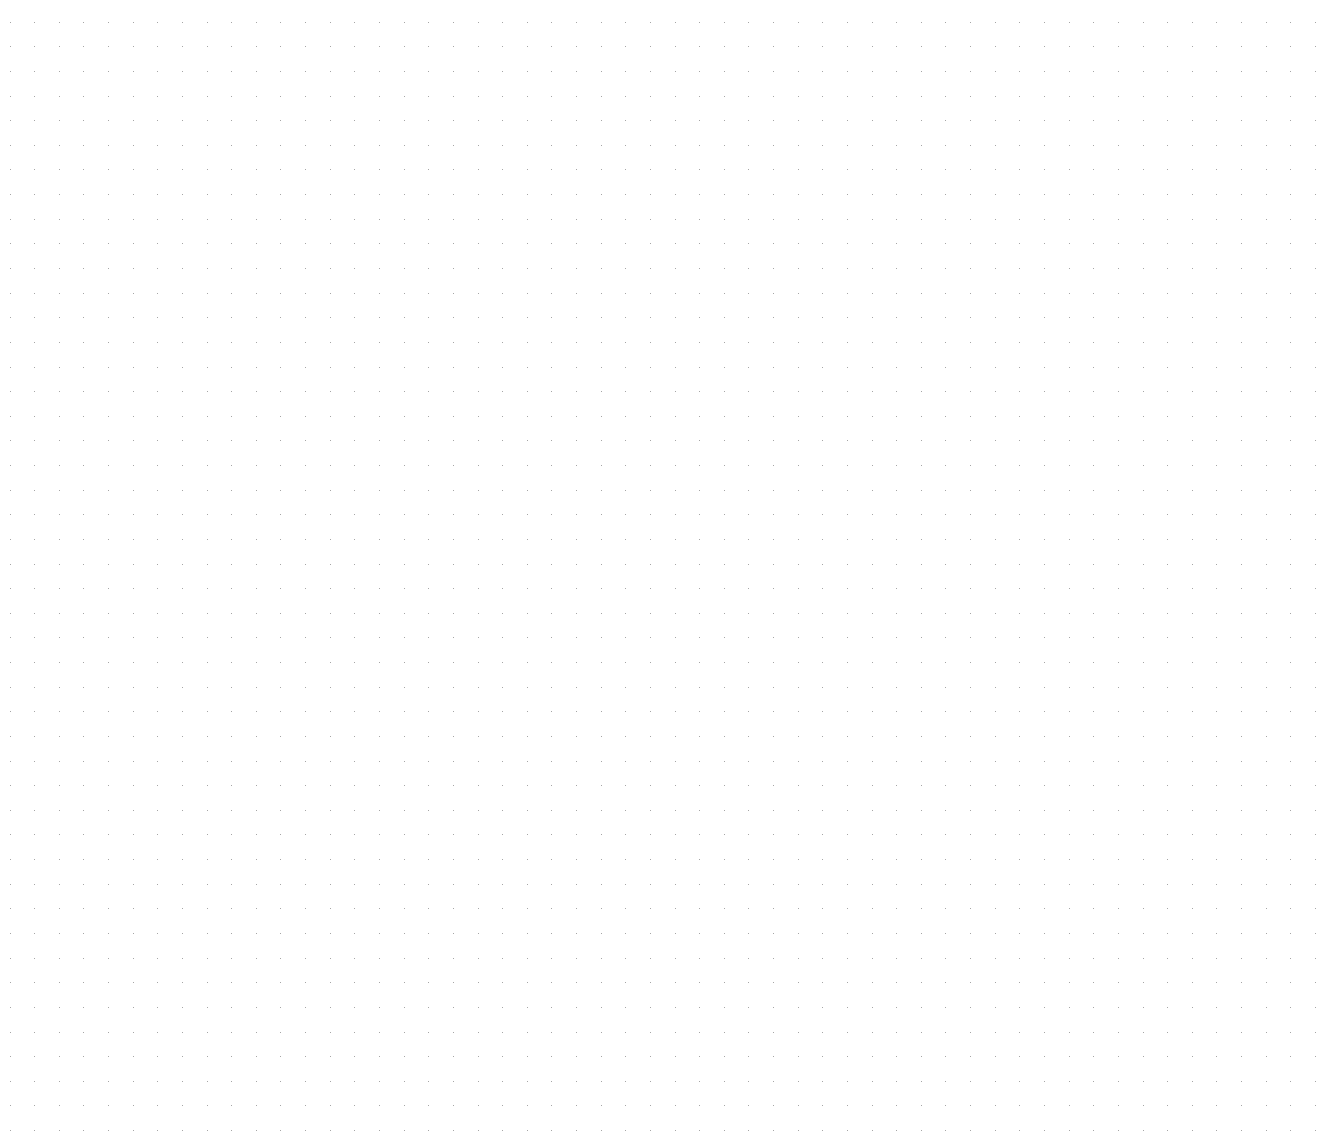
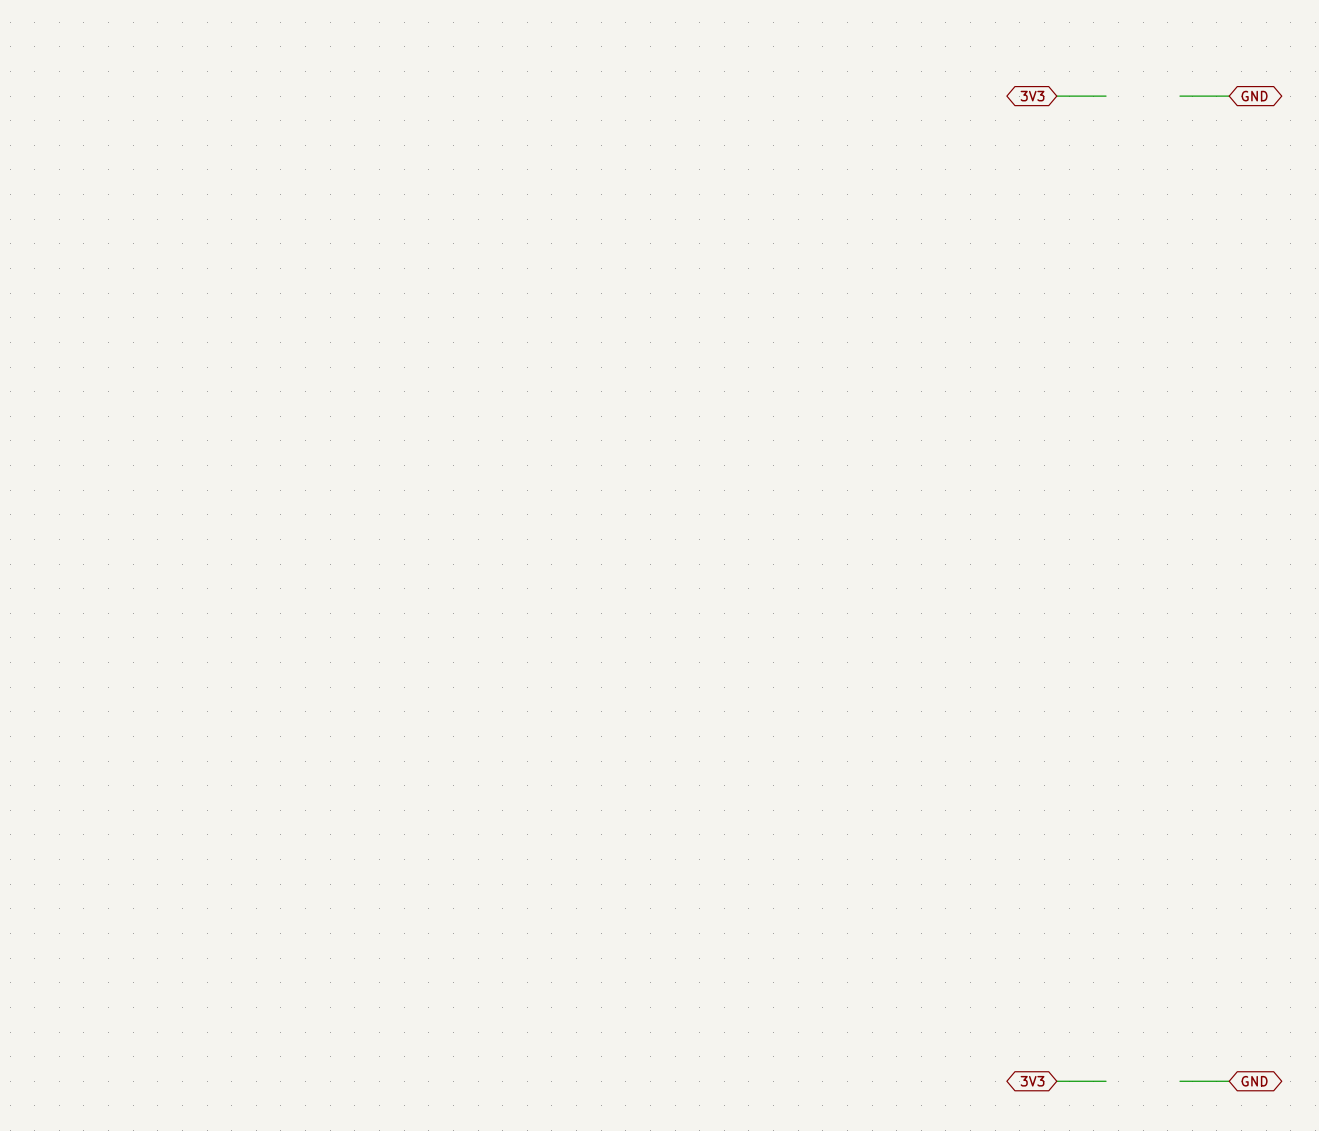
global label: none -> 3V3 (1032, 96)
wire: none -> (1056, 96) (1106, 96)
wire: none -> (1179, 96) (1229, 96)
global label: none -> GND (1254, 96)
global label: none -> 3V3 (1032, 1081)
wire: none -> (1056, 1081) (1106, 1081)
wire: none -> (1179, 1081) (1229, 1081)
global label: none -> GND (1254, 1081)

